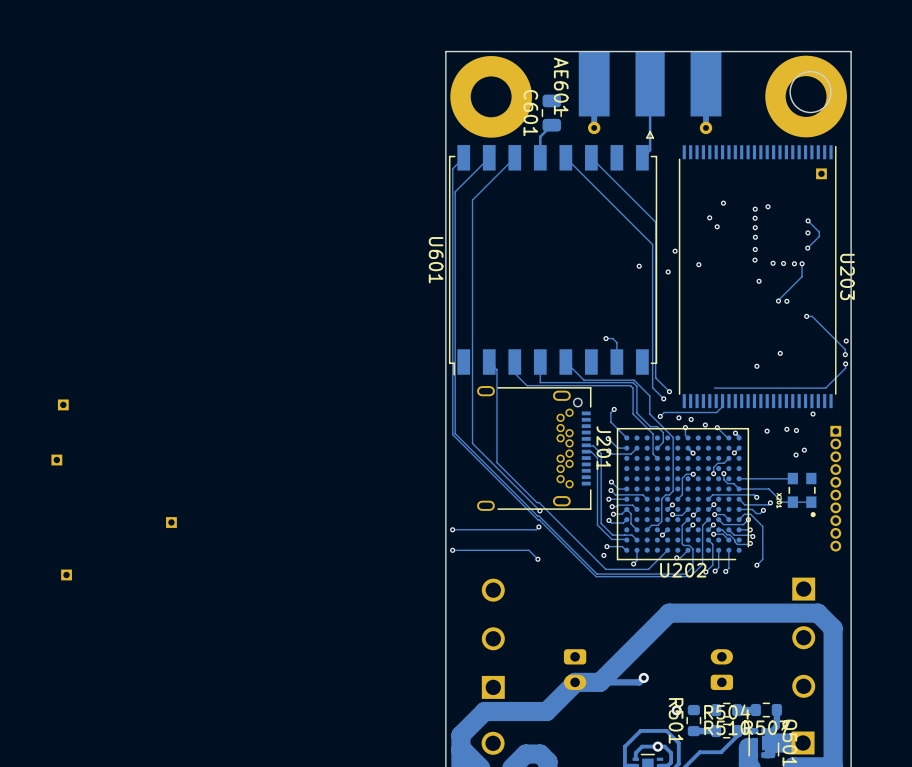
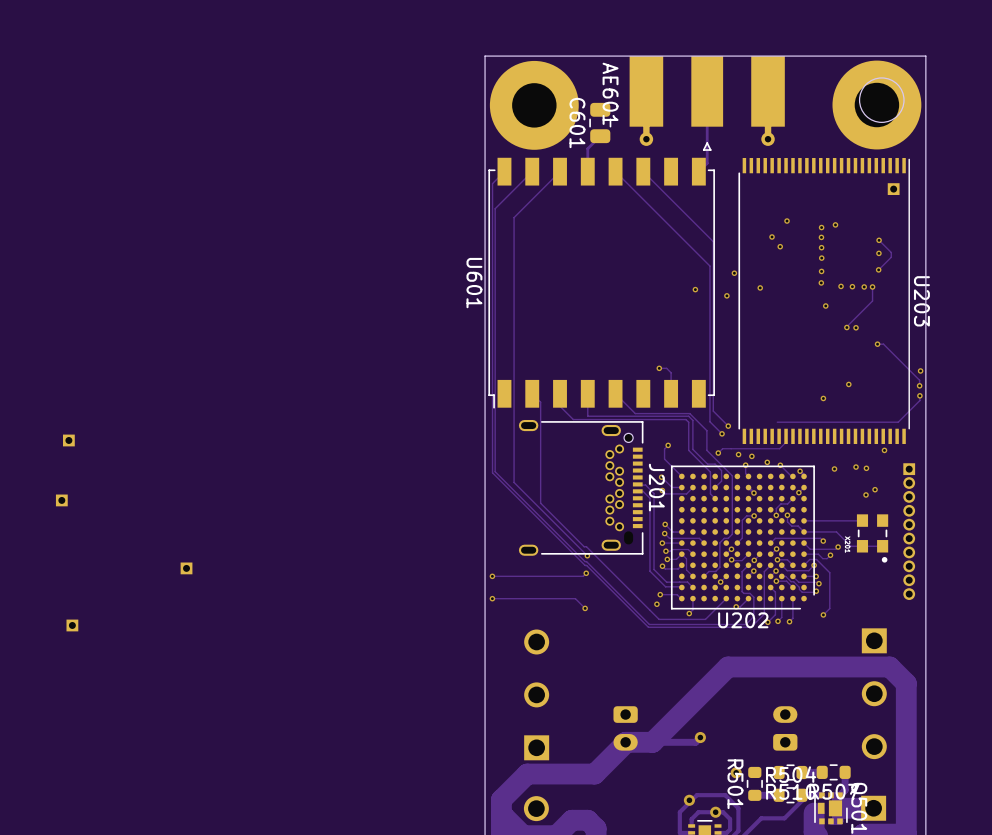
via: none -> (689, 800)

